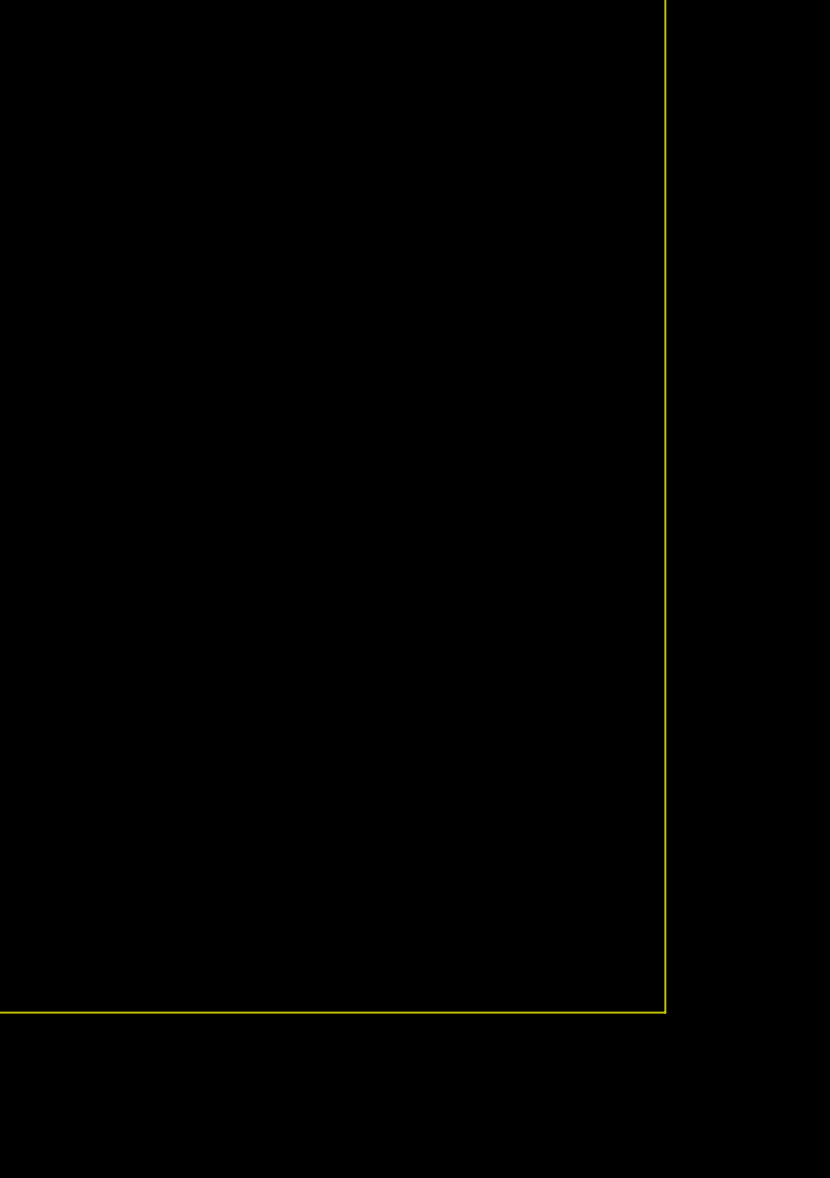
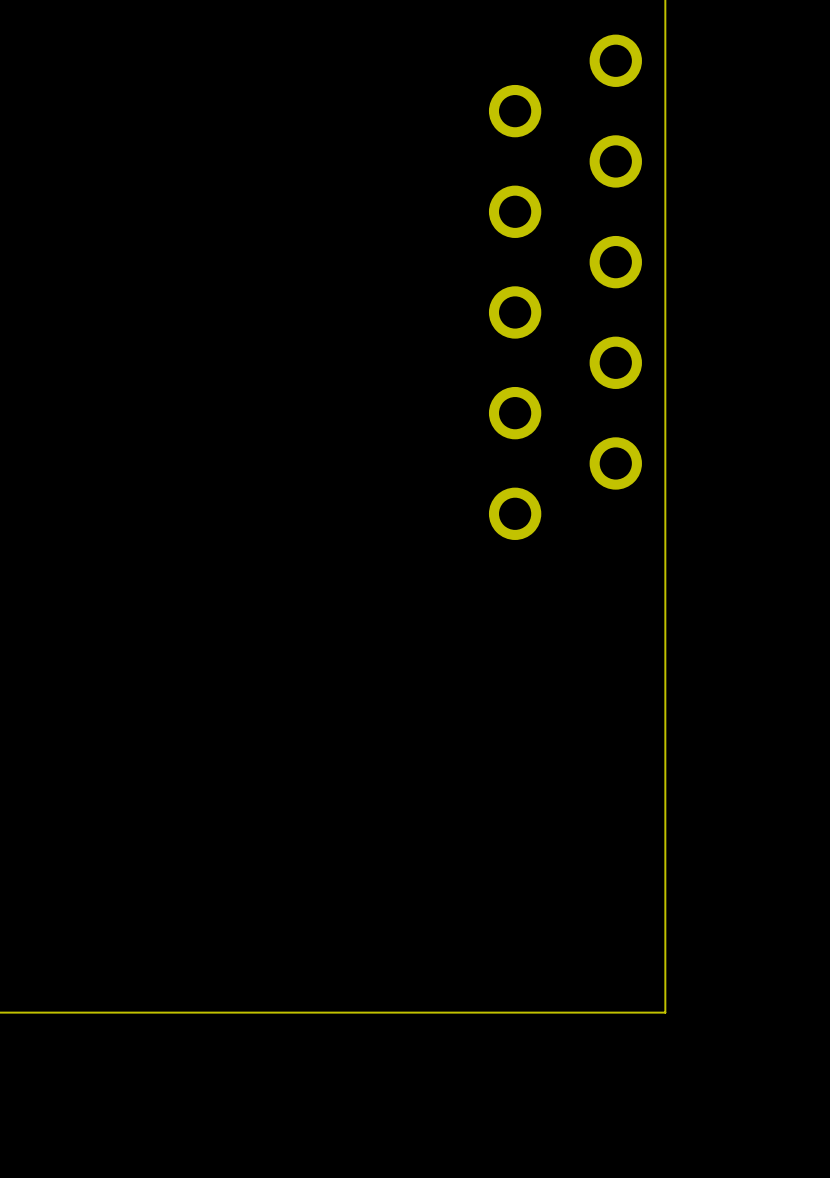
part: none -> (565, 287)

